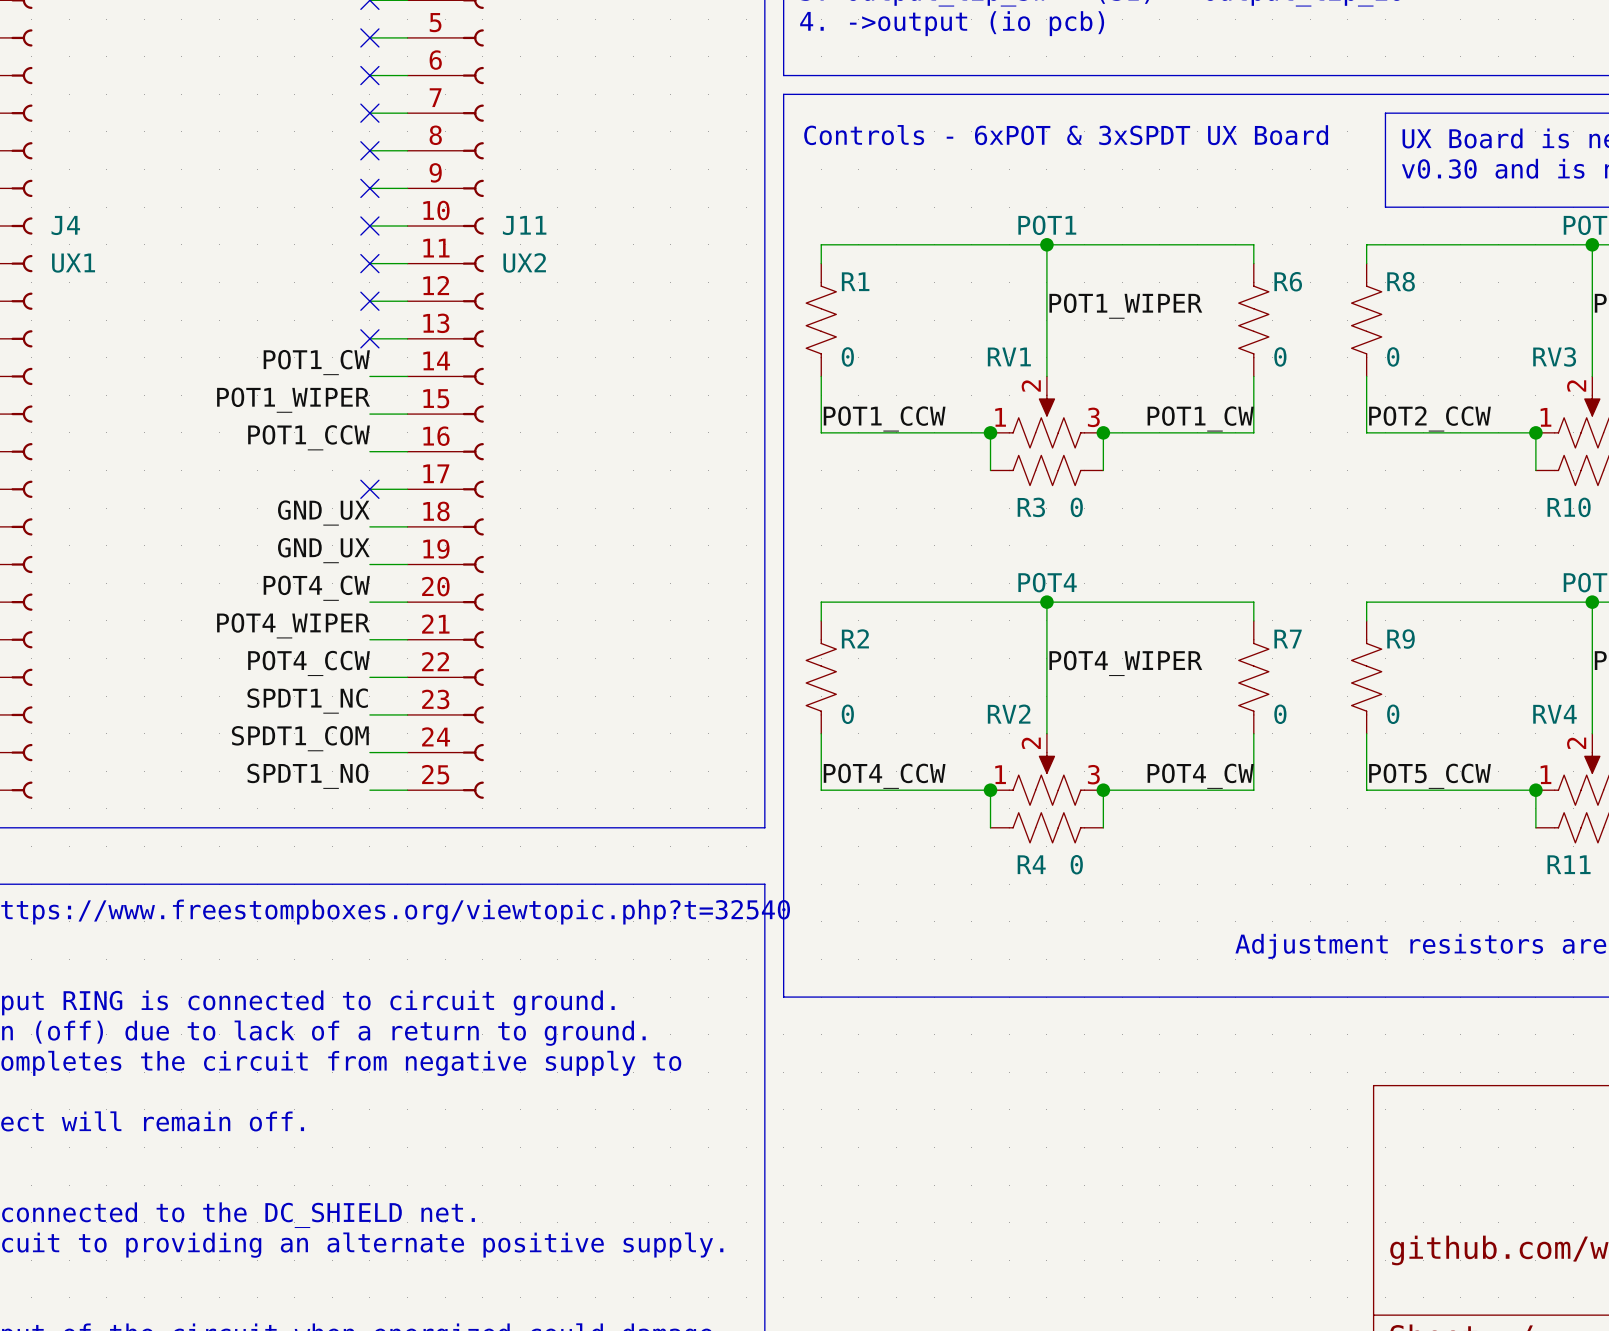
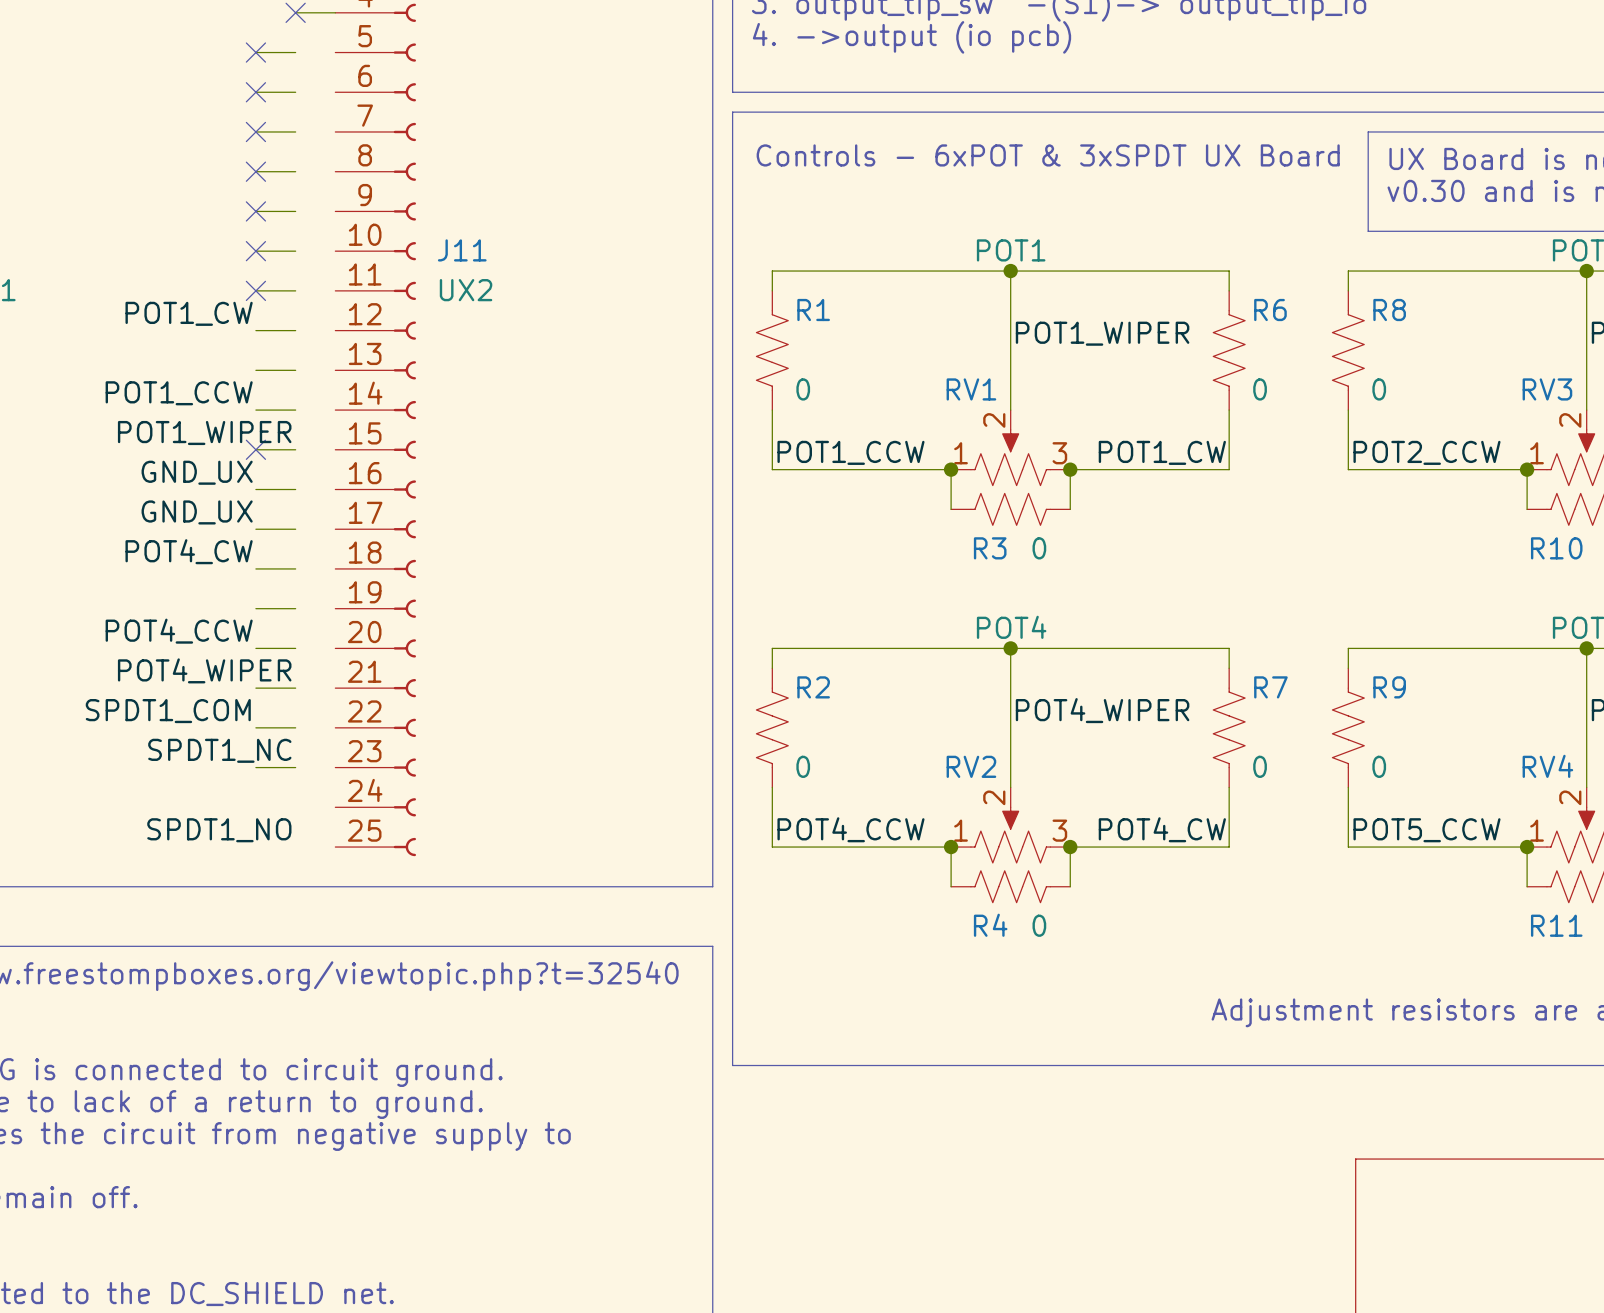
no-connect mark: none -> (255, 52)
wire: (369, 37) (407, 37) -> (295, 52) (255, 52)
no-connect mark: (369, 37) -> none
no-connect mark: none -> (255, 92)
wire: (369, 75) (407, 75) -> (295, 92) (255, 92)
no-connect mark: (369, 75) -> none
no-connect mark: none -> (255, 131)
wire: (369, 113) (407, 113) -> (295, 131) (255, 131)
no-connect mark: (369, 113) -> none
no-connect mark: none -> (255, 171)
wire: (369, 150) (407, 150) -> (295, 171) (255, 171)
no-connect mark: (369, 150) -> none
no-connect mark: none -> (255, 211)
wire: (369, 188) (407, 188) -> (295, 211) (255, 211)
no-connect mark: (369, 188) -> none
no-connect mark: none -> (255, 251)
wire: (369, 226) (407, 226) -> (295, 251) (255, 251)
no-connect mark: (369, 226) -> none
no-connect mark: none -> (255, 290)
wire: (369, 263) (407, 263) -> (295, 290) (255, 290)
no-connect mark: (369, 263) -> none
wire: (369, 301) (407, 301) -> (295, 330) (255, 330)
no-connect mark: (369, 301) -> none
wire: (369, 338) (407, 338) -> (295, 370) (255, 370)
no-connect mark: (369, 338) -> none
label position: POT1_CW (316, 362) -> POT1_CW (189, 313)
wire: (369, 376) (407, 376) -> (295, 410) (255, 410)
no-connect mark: none -> (255, 449)
wire: (369, 414) (407, 414) -> (295, 449) (255, 449)
label: none -> GND_UX (197, 472)
label position: POT1_CCW (309, 437) -> POT1_CCW (179, 393)
wire: (369, 451) (407, 451) -> (295, 489) (255, 489)
wire: (369, 489) (407, 489) -> (295, 529) (255, 529)
no-connect mark: (369, 489) -> none
label position: GND_UX (323, 512) -> GND_UX (197, 512)
wire: (369, 526) (407, 526) -> (295, 568) (255, 568)
label: GND_UX (323, 550) -> none
wire: (369, 564) (407, 564) -> (295, 608) (255, 608)
label position: POT4_CW (316, 588) -> POT4_CW (189, 551)
wire: (369, 602) (407, 602) -> (295, 648) (255, 648)
wire: (369, 639) (407, 639) -> (295, 688) (255, 688)
label position: POT4_CCW (309, 663) -> POT4_CCW (179, 631)
wire: (369, 677) (407, 677) -> (295, 727) (255, 727)
wire: (369, 714) (407, 714) -> (295, 767) (255, 767)
label position: SPDT1_COM (300, 738) -> SPDT1_COM (168, 711)
wire: (369, 752) (407, 752) -> none
wire: (369, 790) (407, 790) -> none

